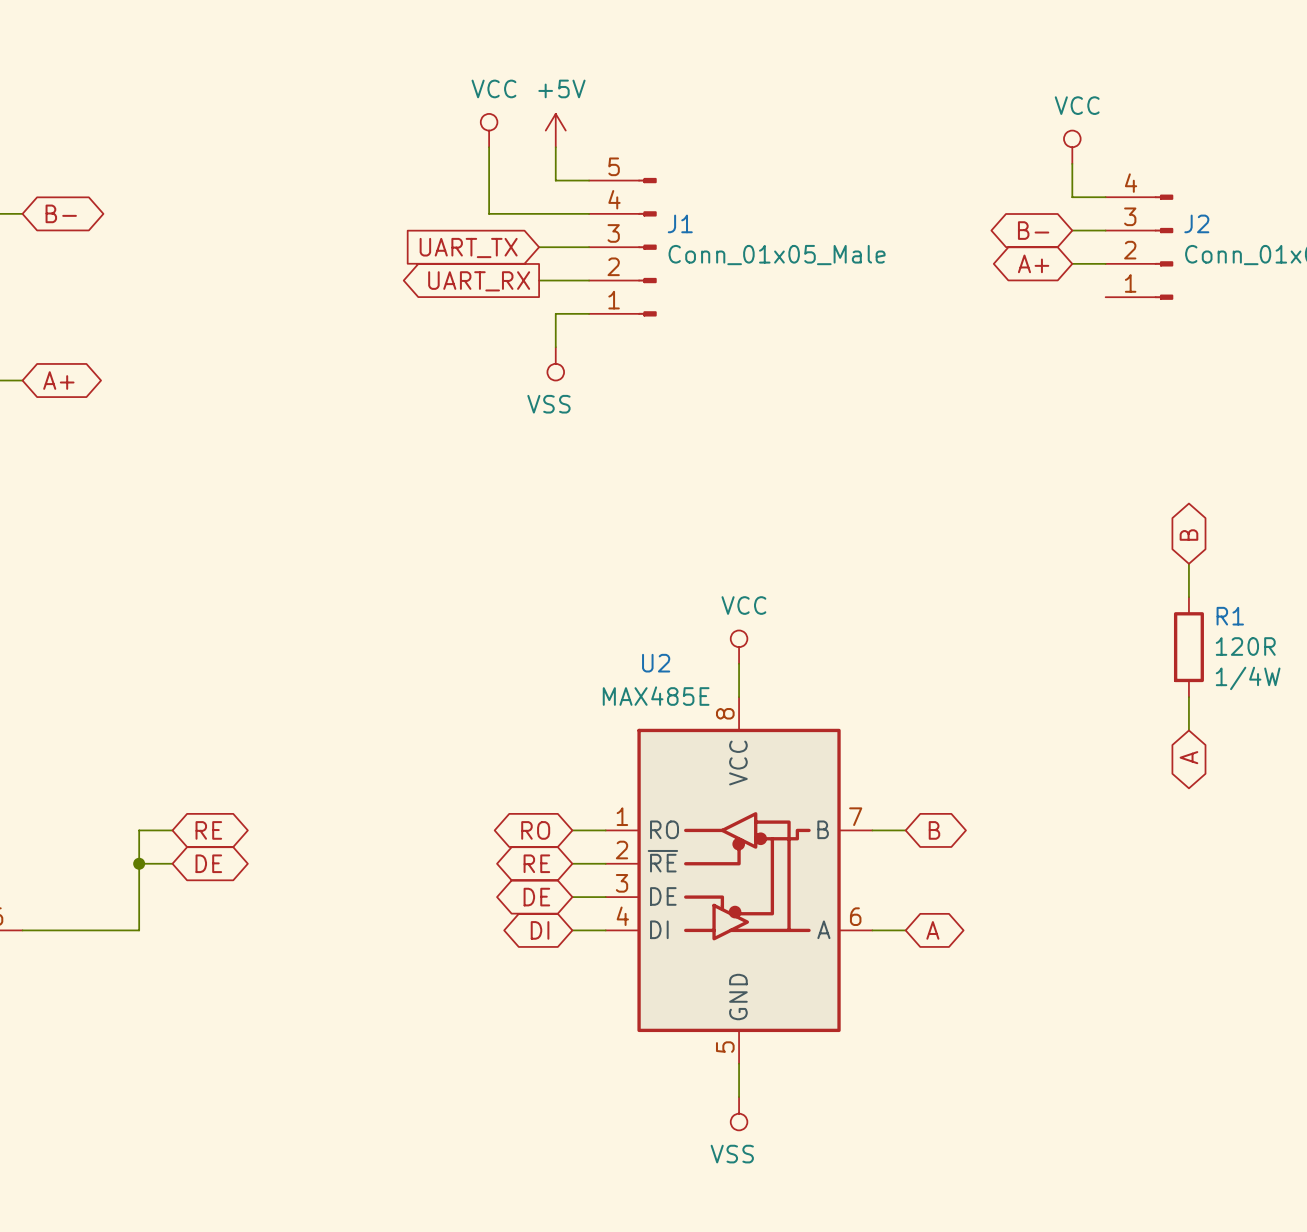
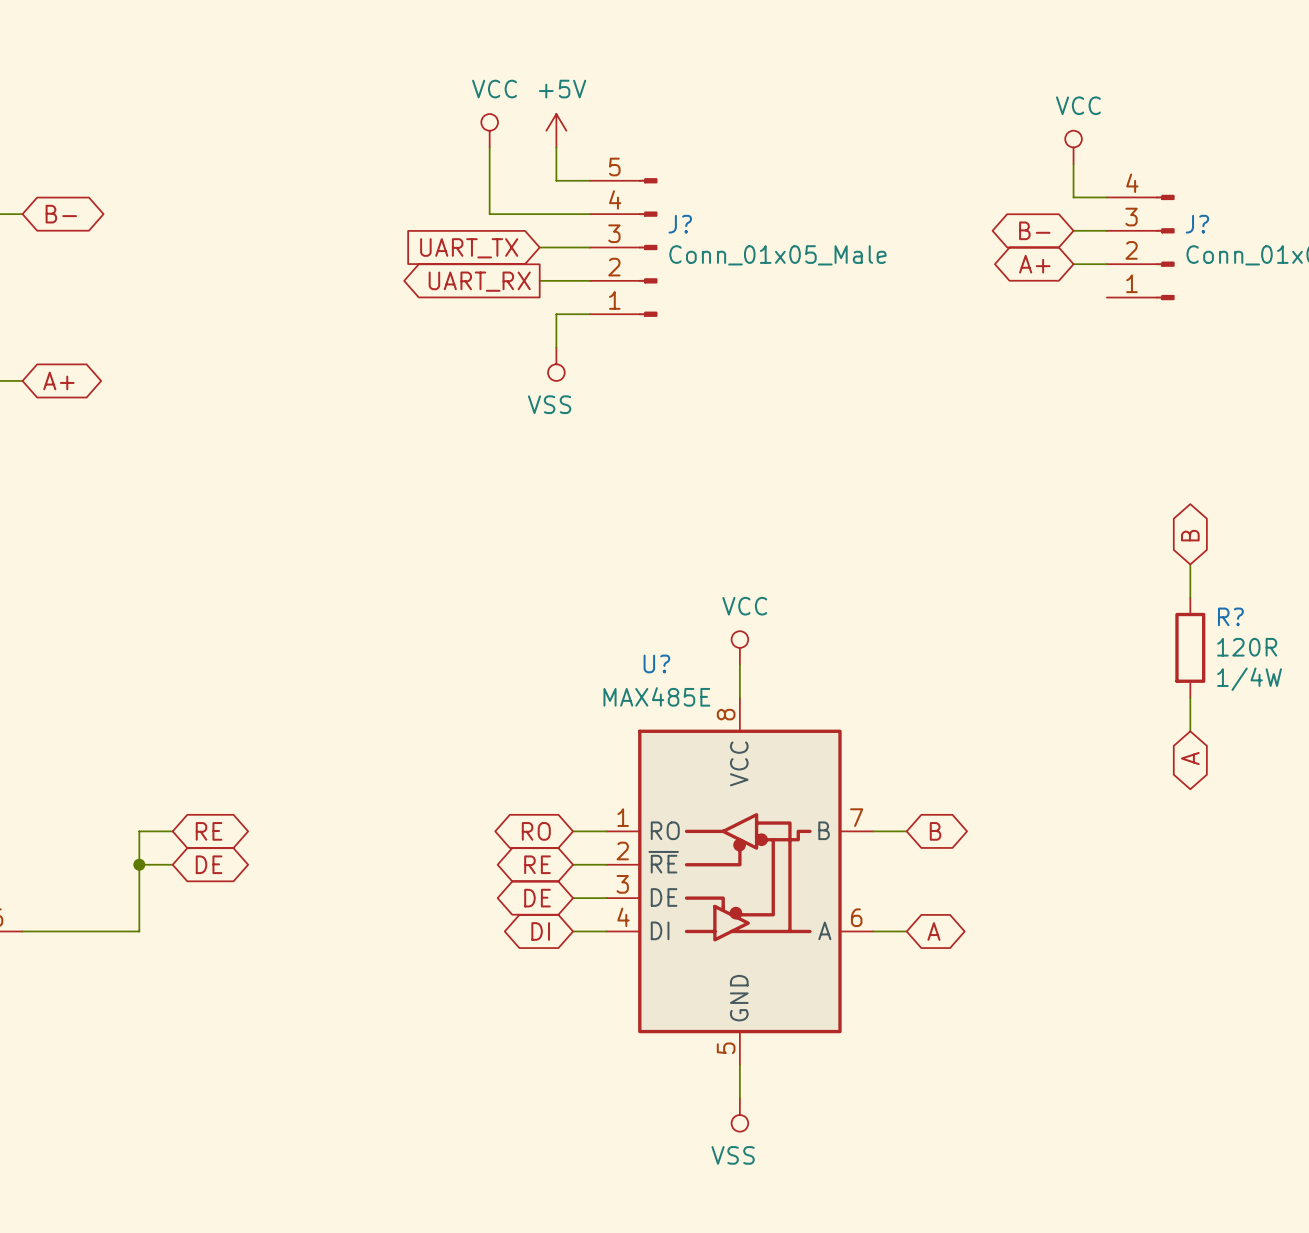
J1 name: J1 (680, 223) -> J? (680, 224)
J2 name: J2 (1196, 223) -> J? (1197, 224)
R1 name: R1 (1230, 616) -> R? (1230, 616)
U2 name: U2 (656, 663) -> U? (656, 663)

